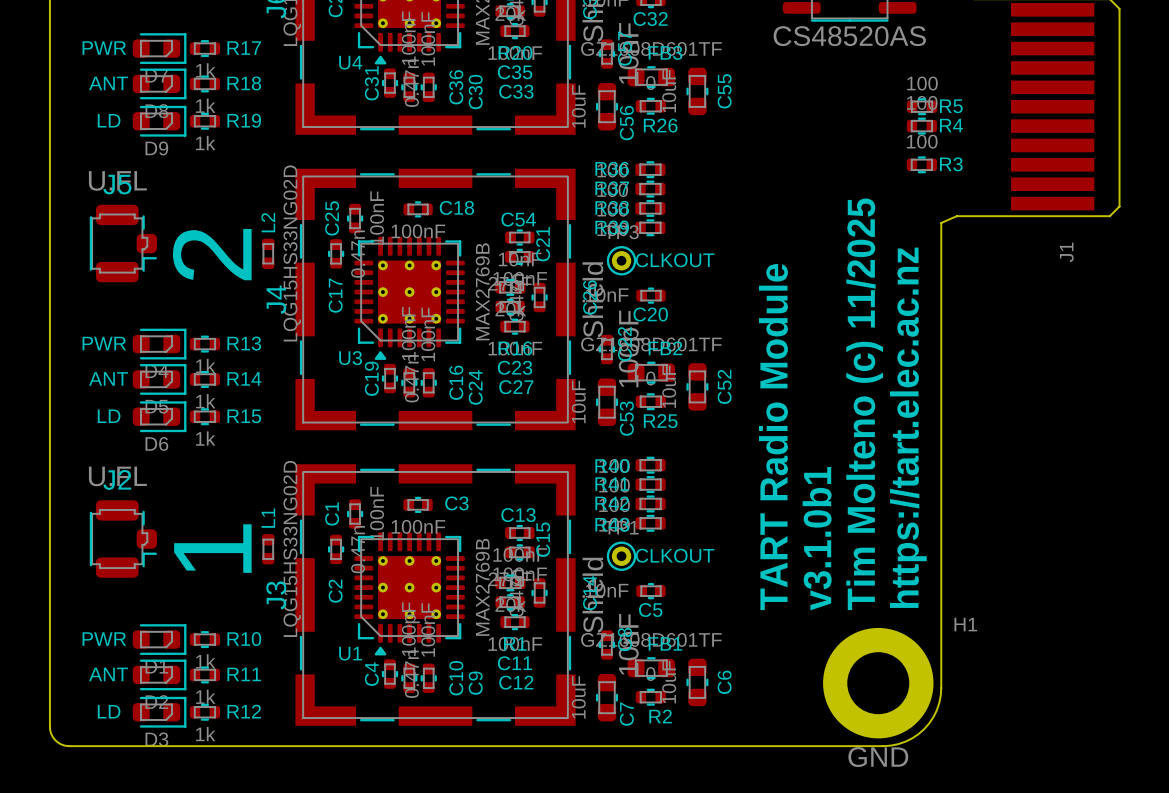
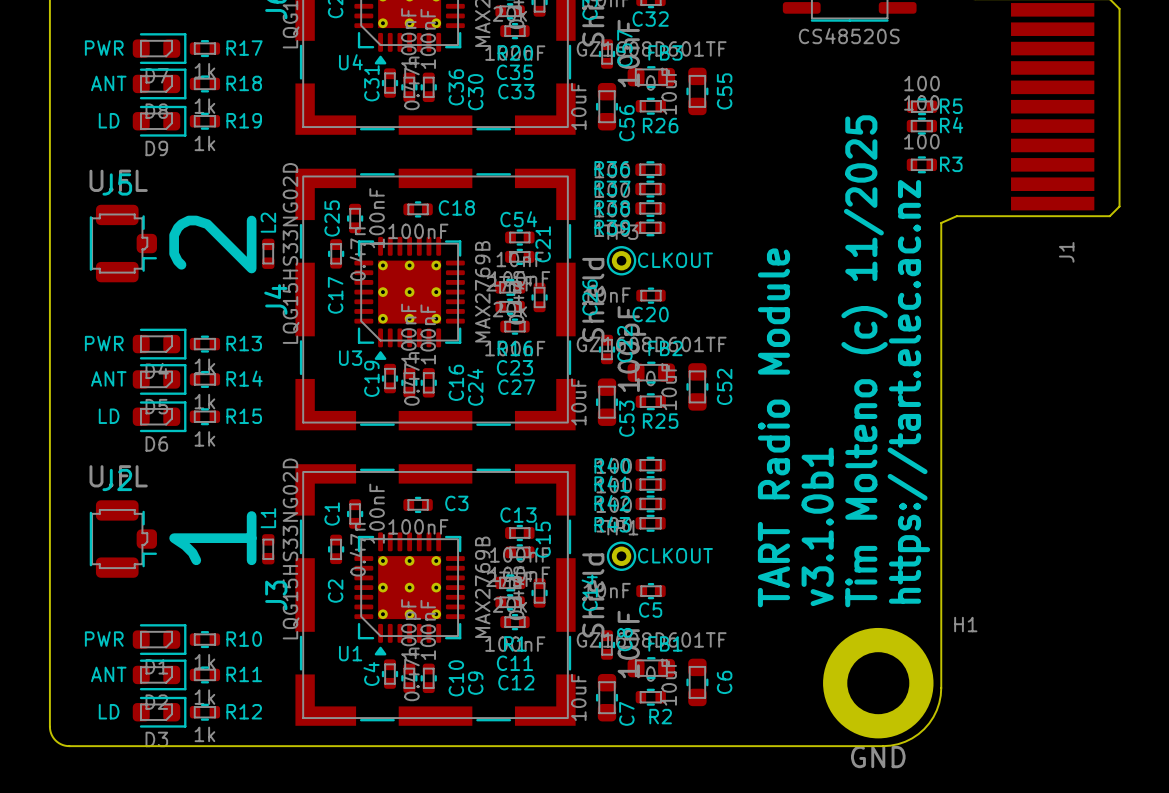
part value: CS48520AS (849, 36) -> CS48520S (849, 36)

